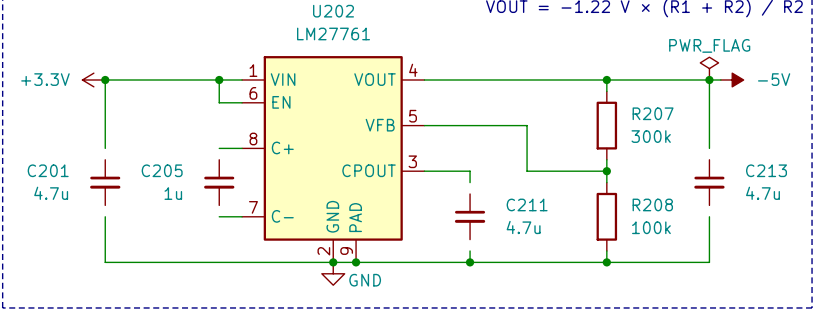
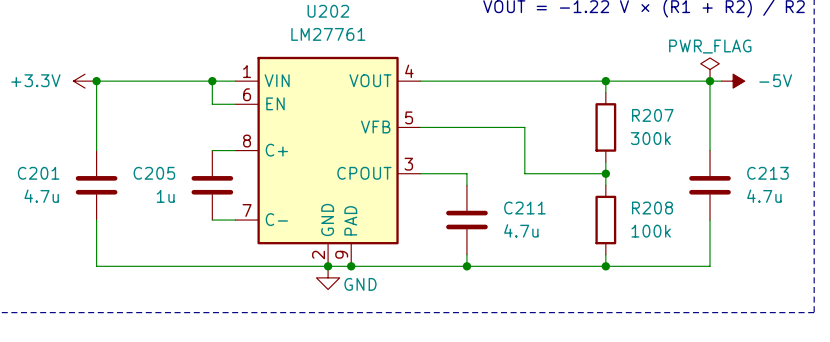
C201 symbol: [90, 159, 121, 206] -> [75, 150, 118, 221]
C205 symbol: [204, 159, 235, 206] -> [191, 150, 234, 221]
C213 symbol: [694, 159, 725, 206] -> [689, 150, 731, 221]
C211 symbol: [454, 193, 486, 240] -> [446, 185, 488, 255]

